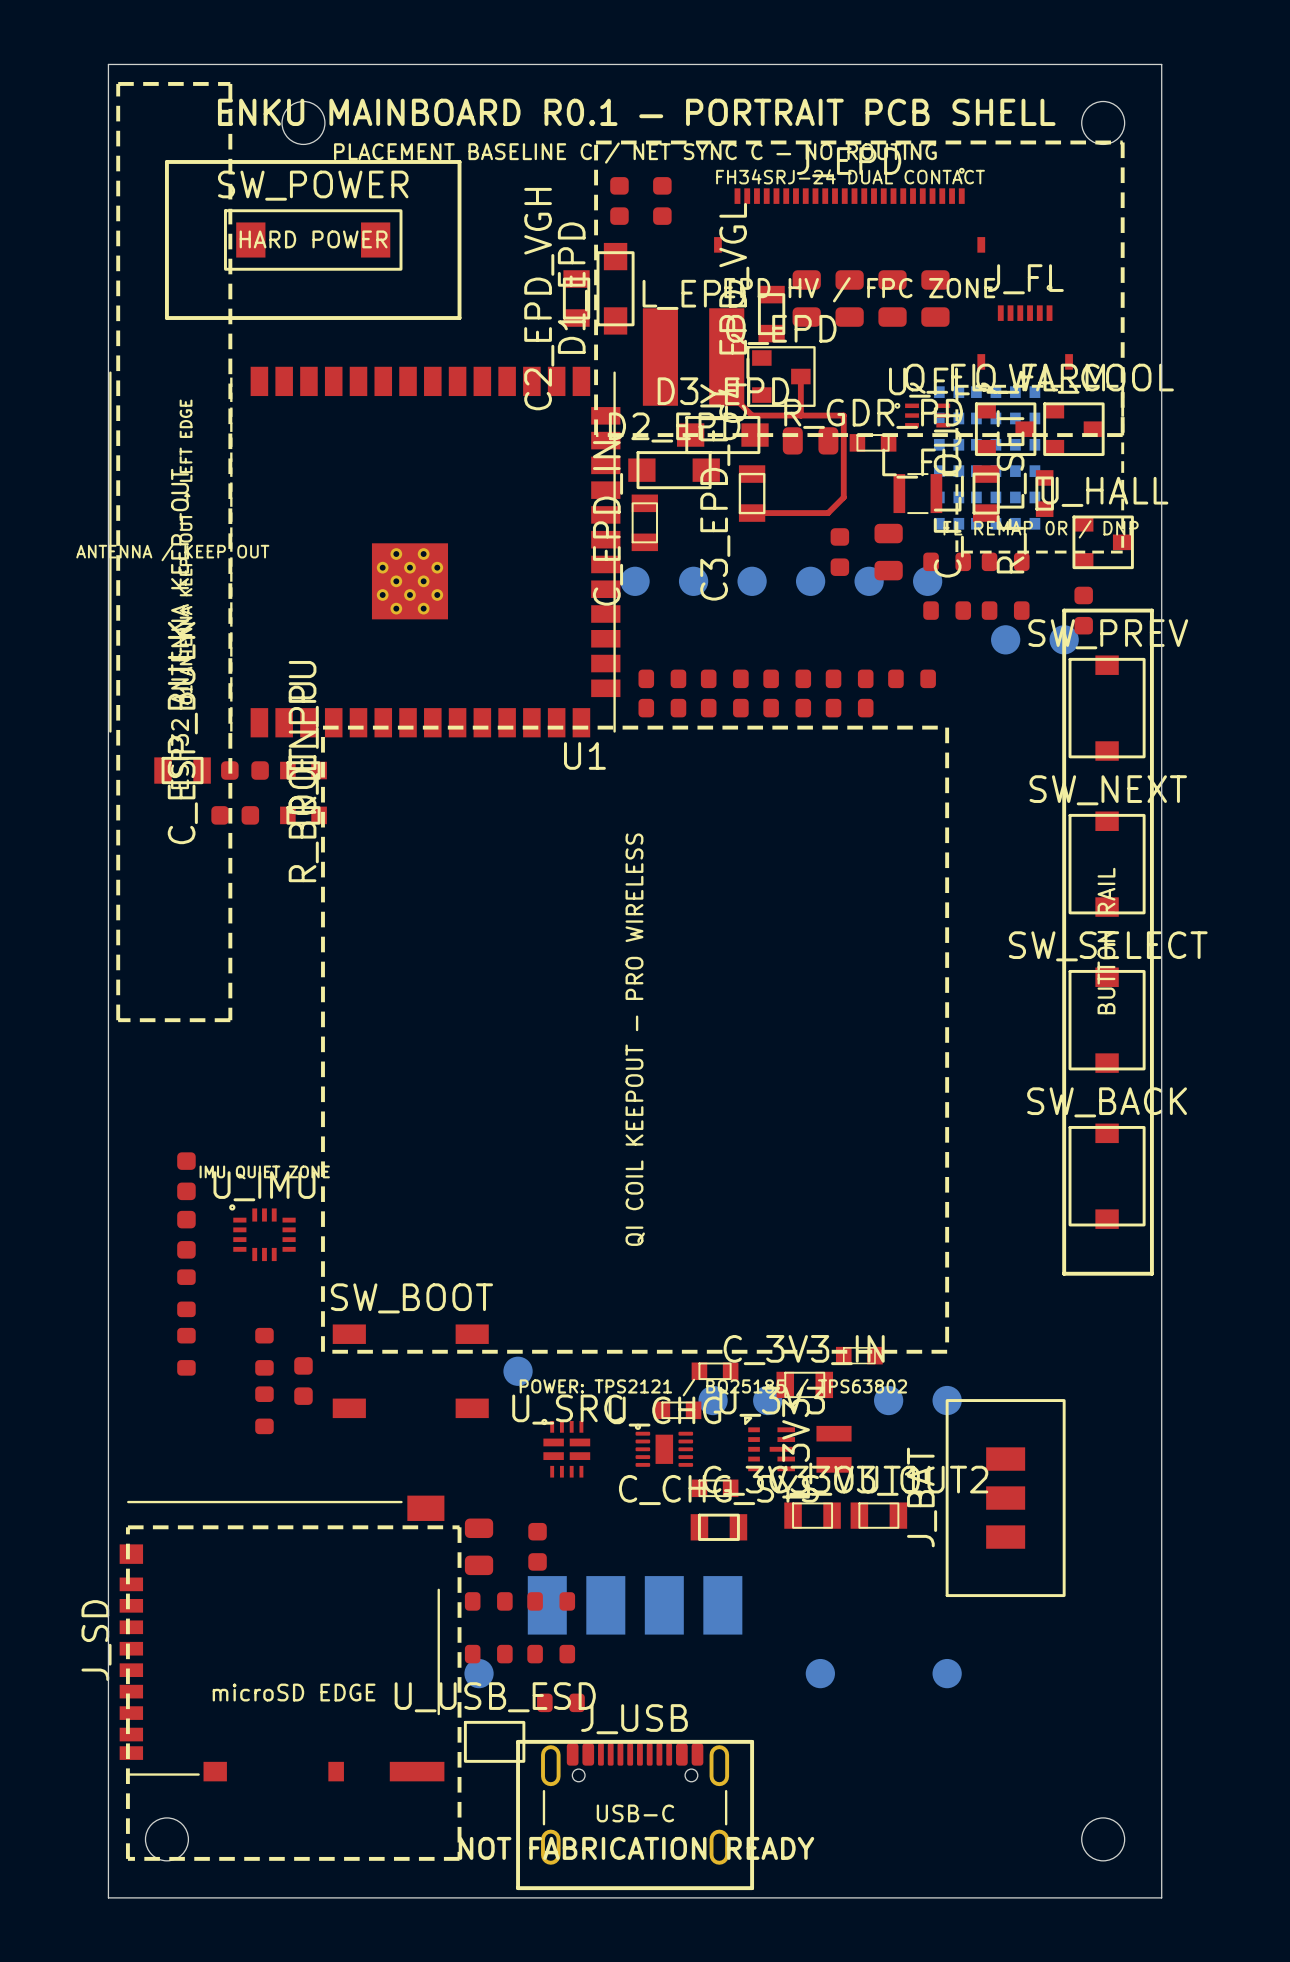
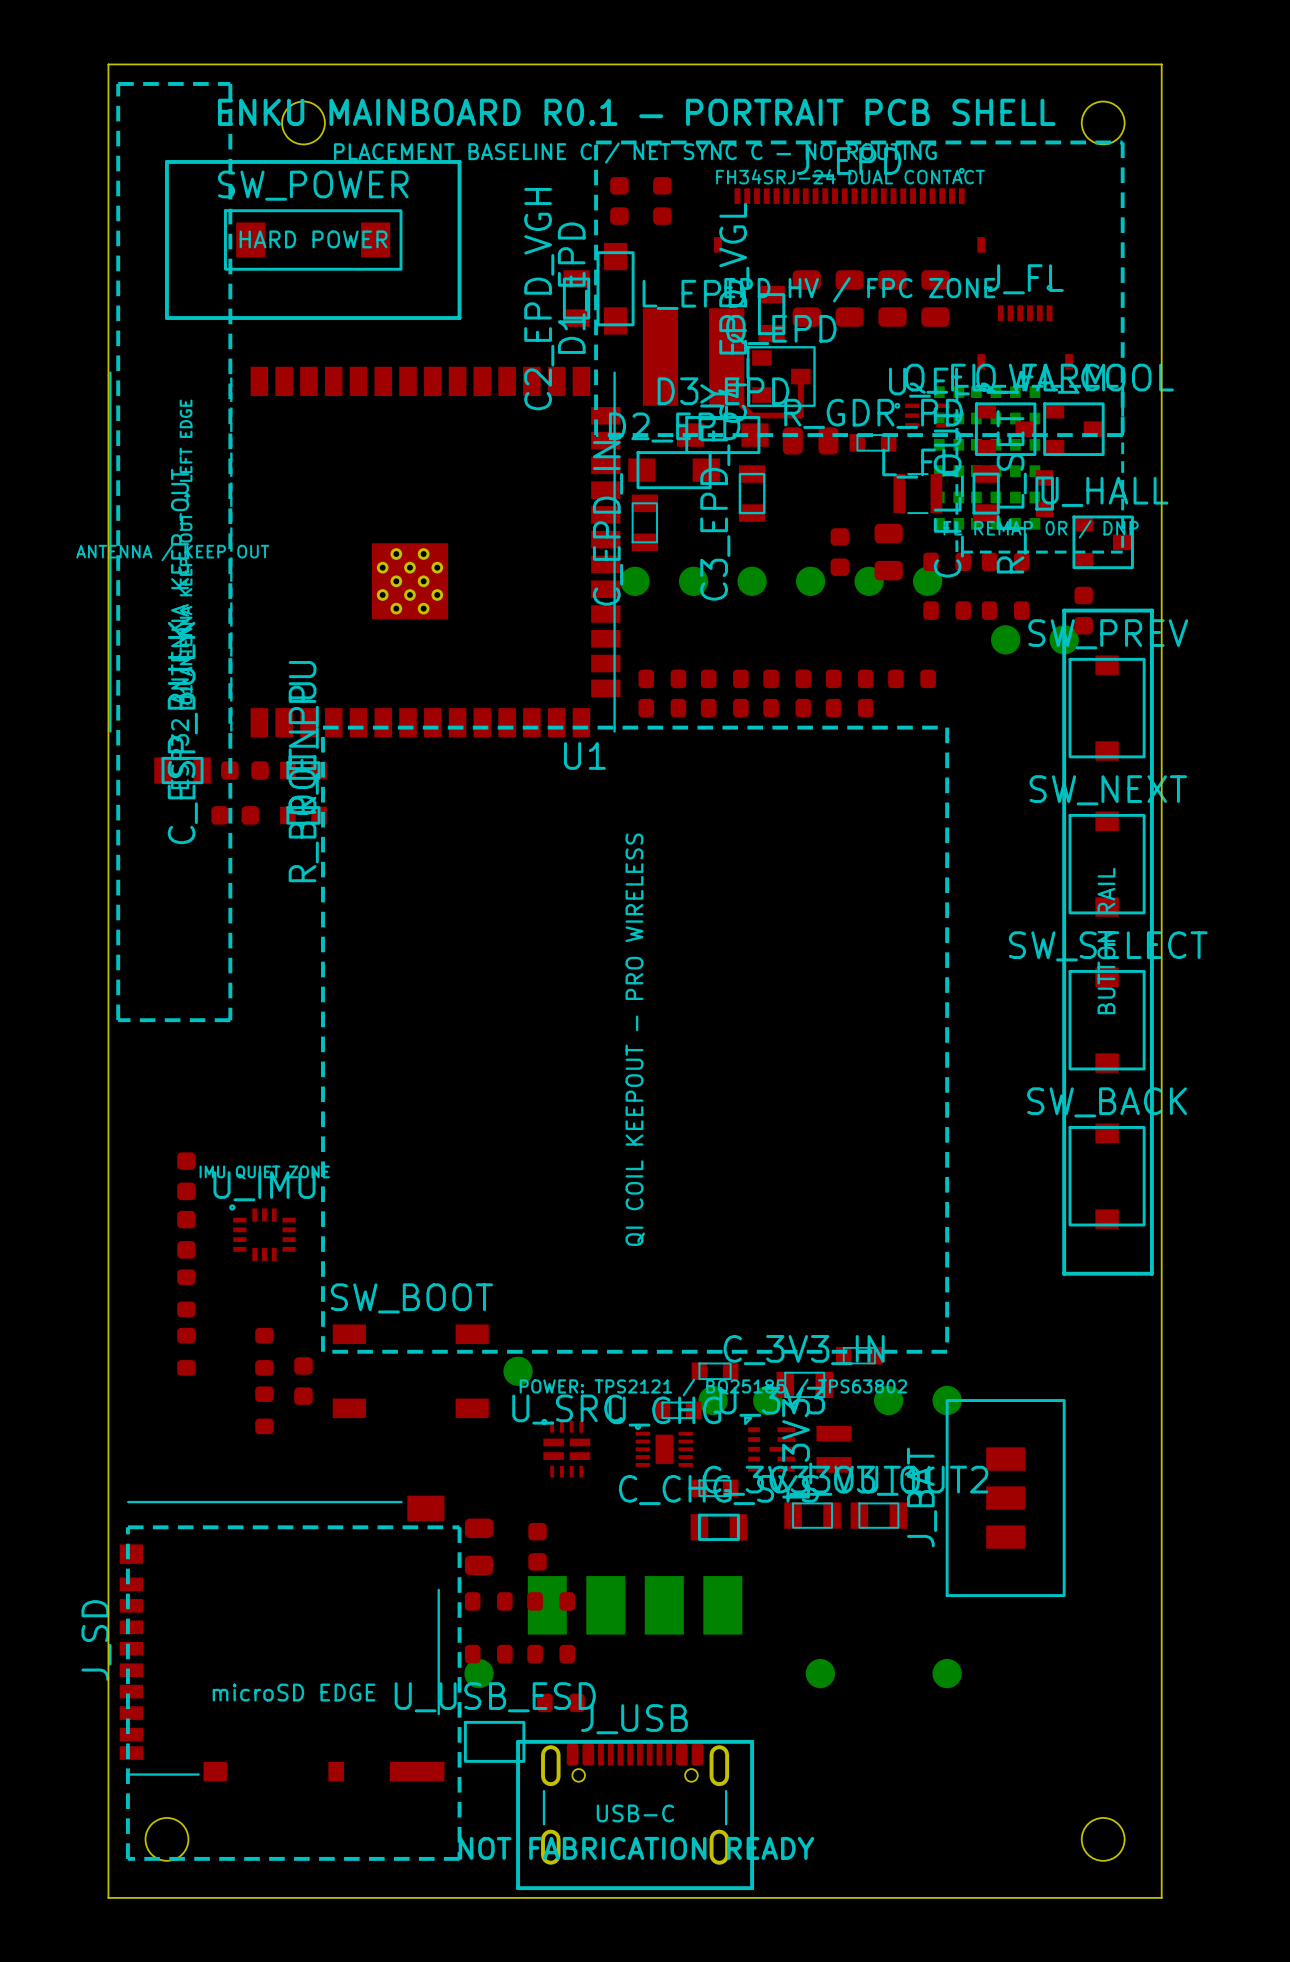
top track: (800, 415) (843, 415) (843, 497) (828, 513) (752, 513) -> none

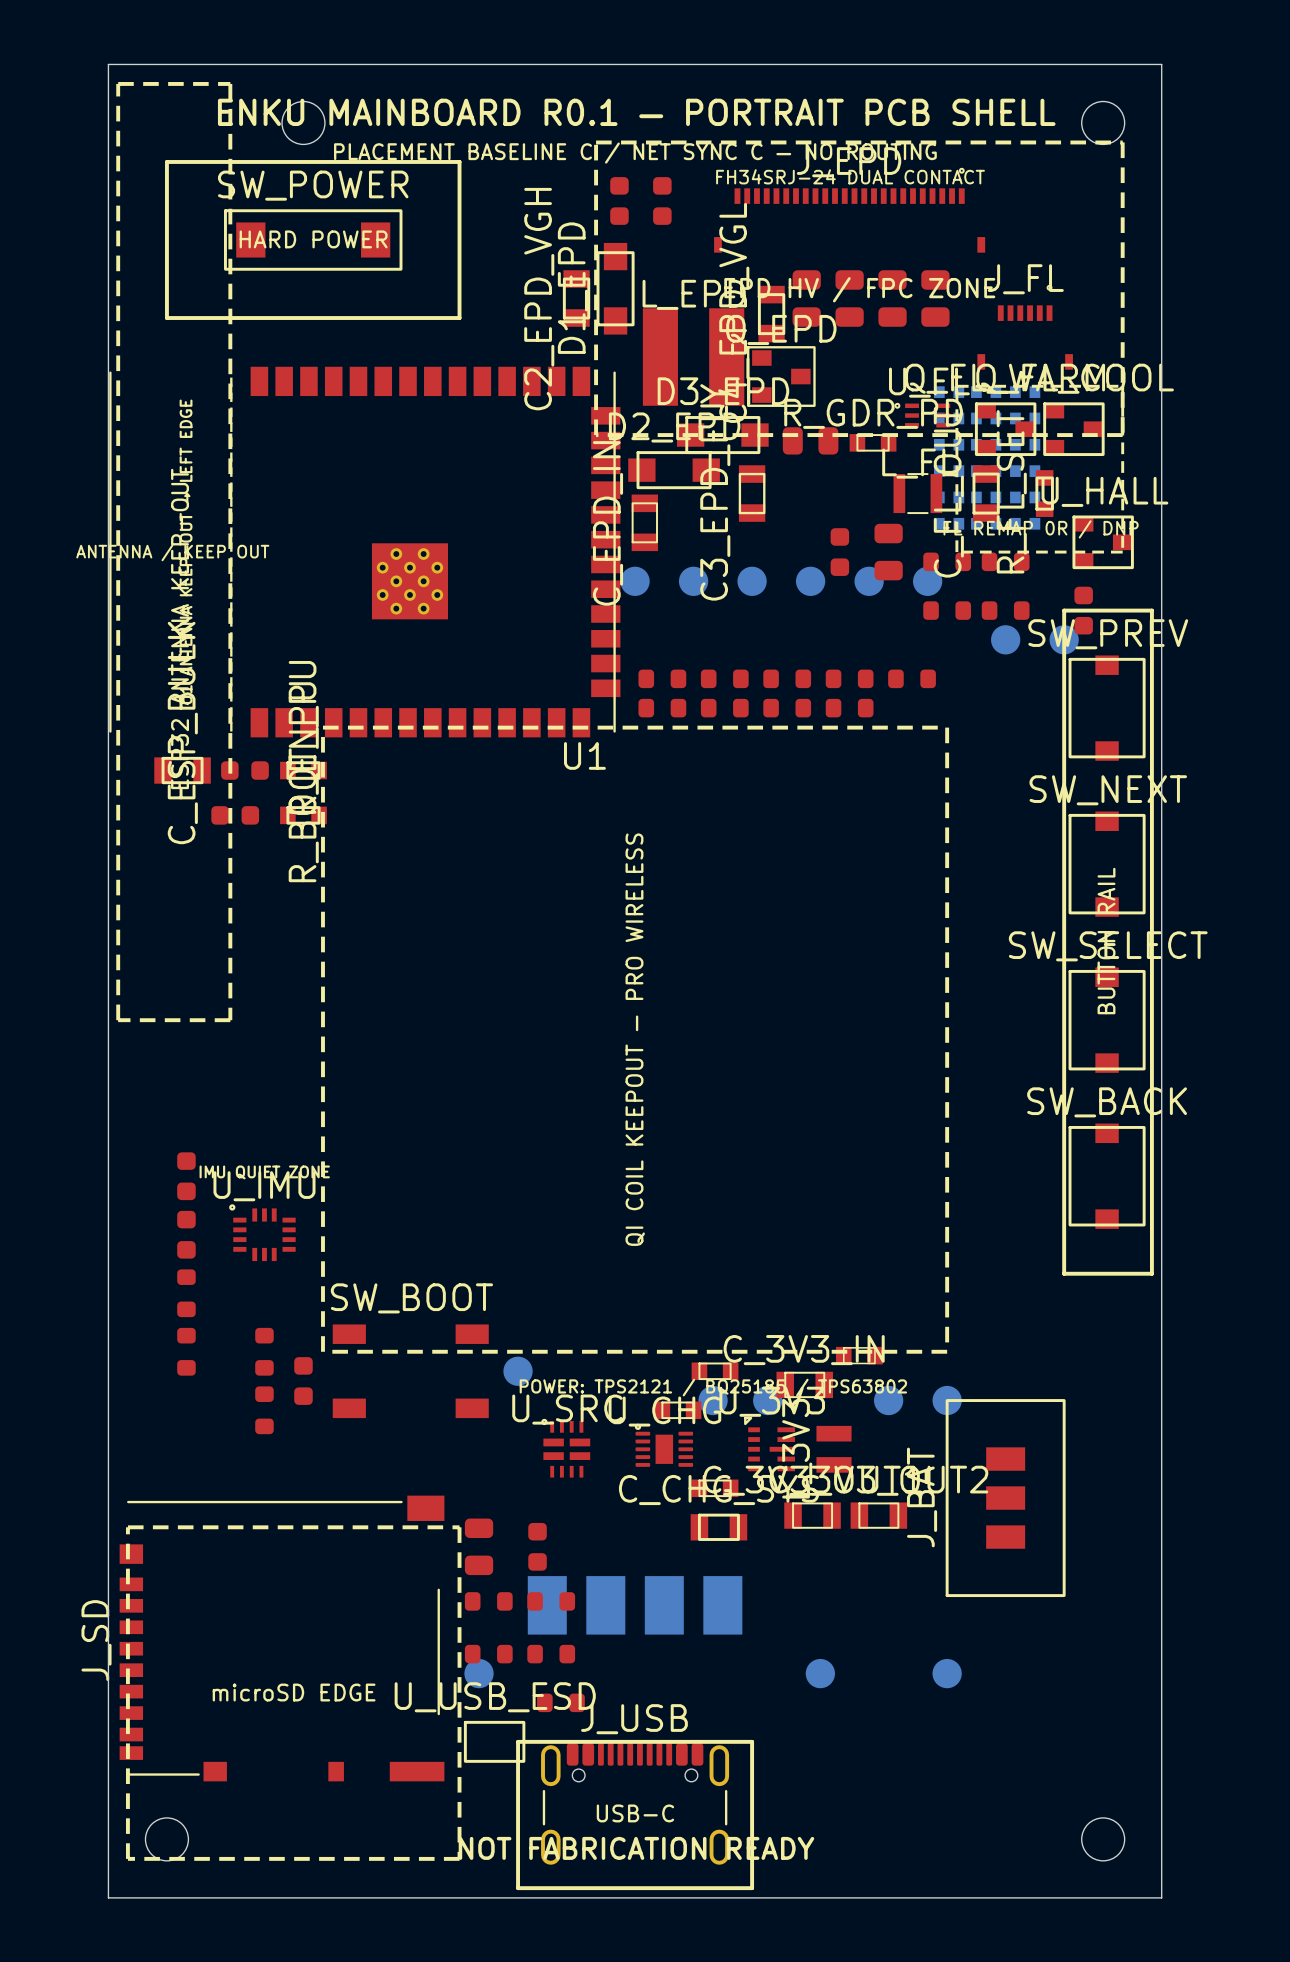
top track: (800, 376) (800, 415) (752, 415) (726, 390) -> none

